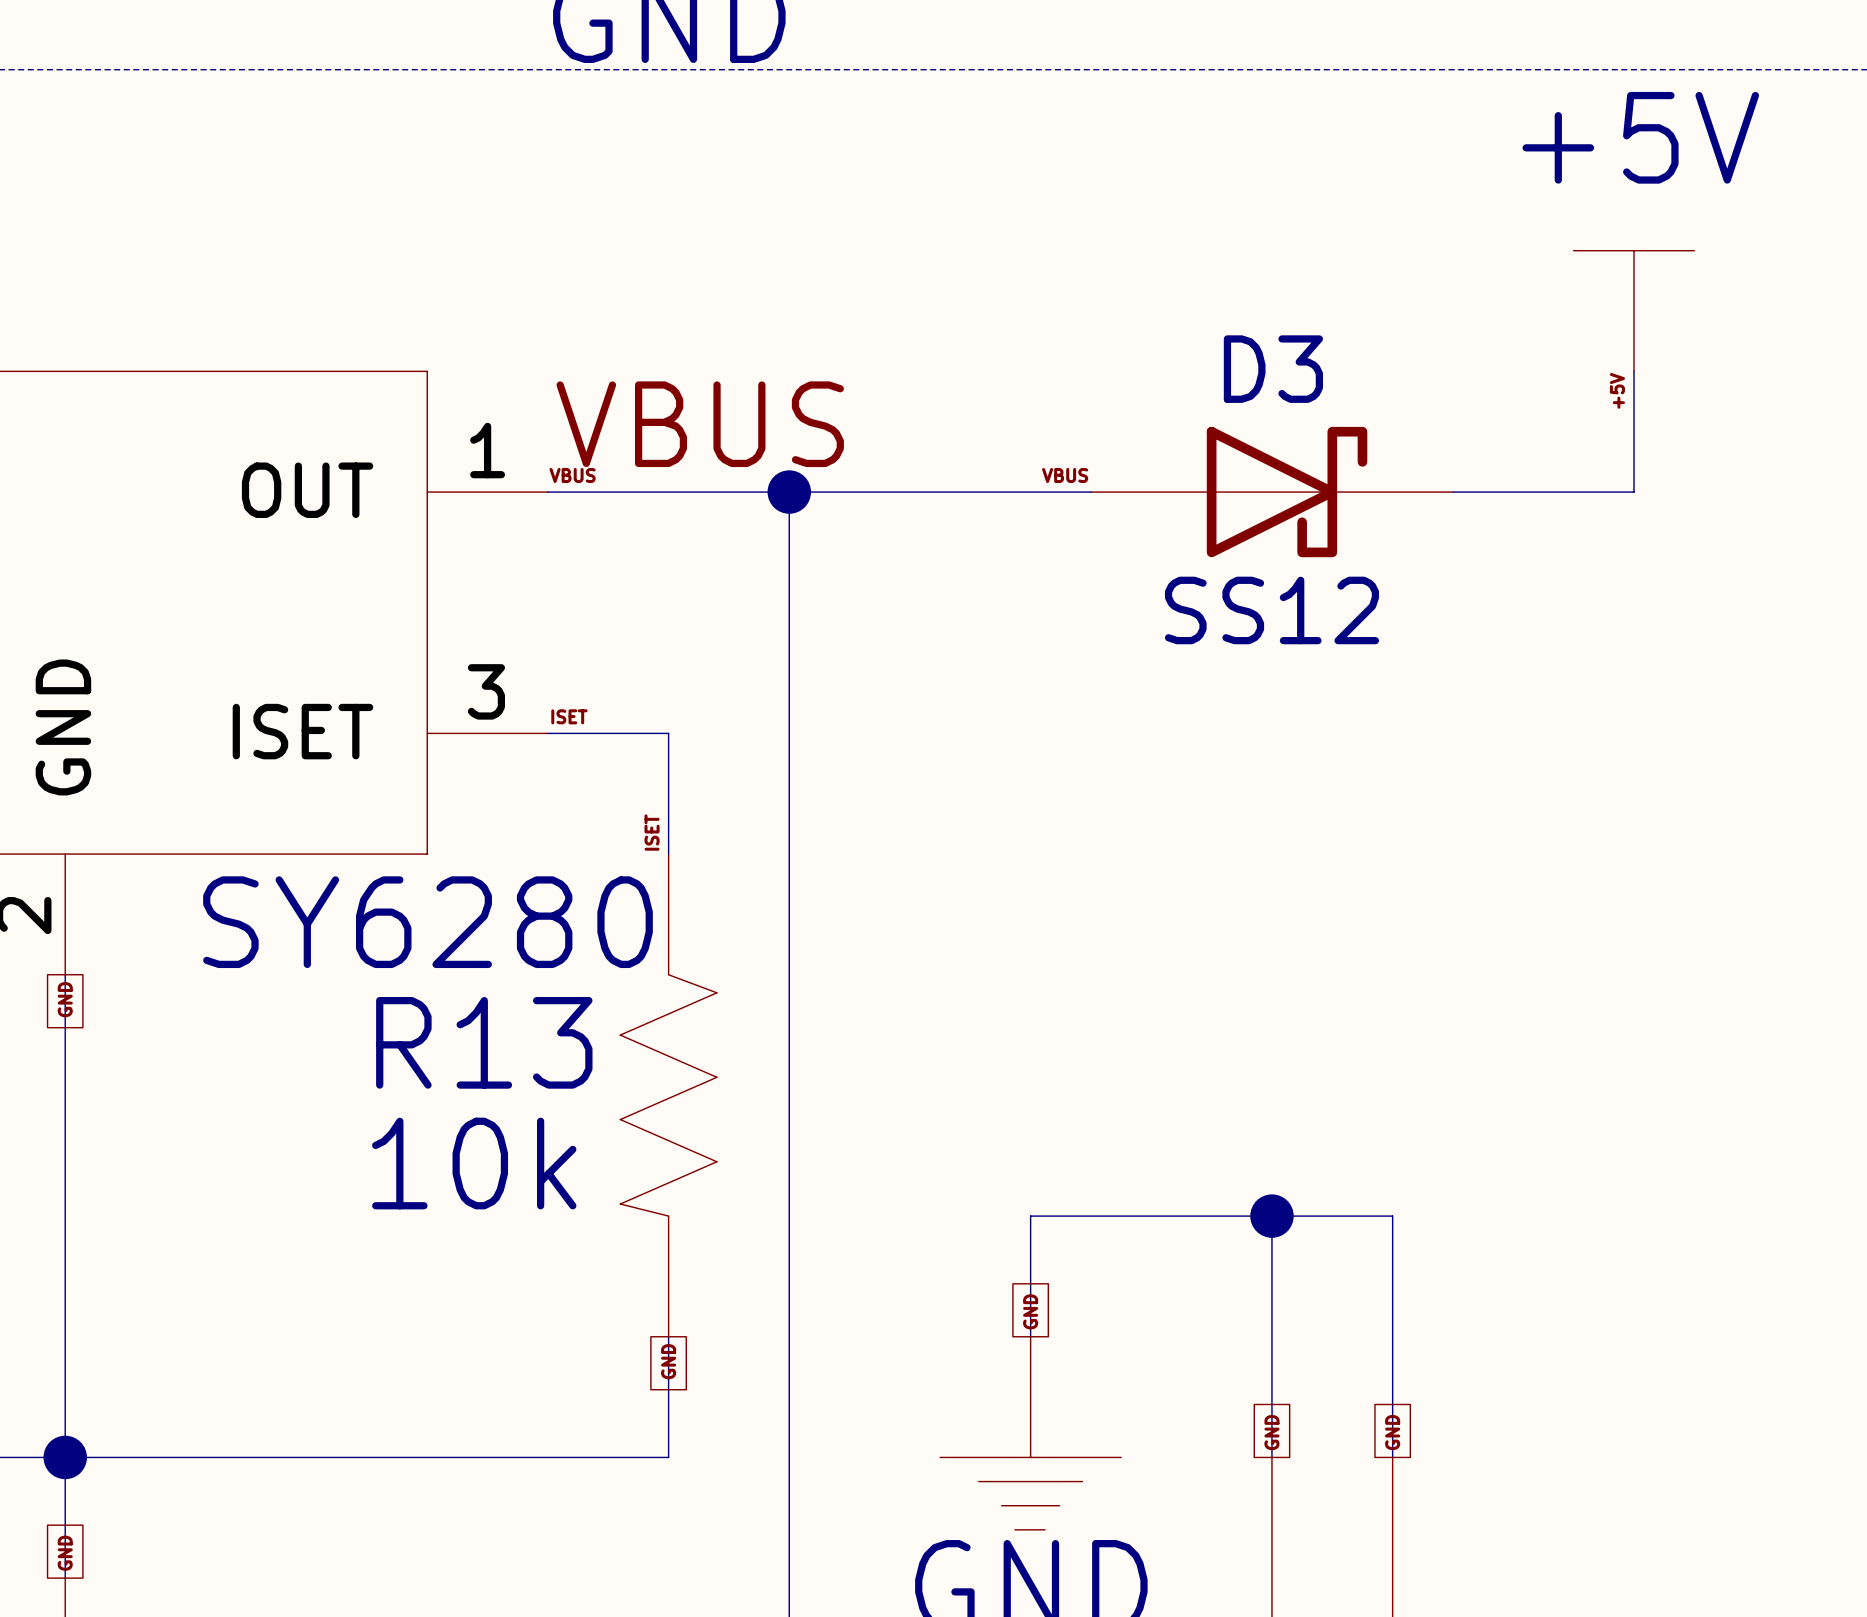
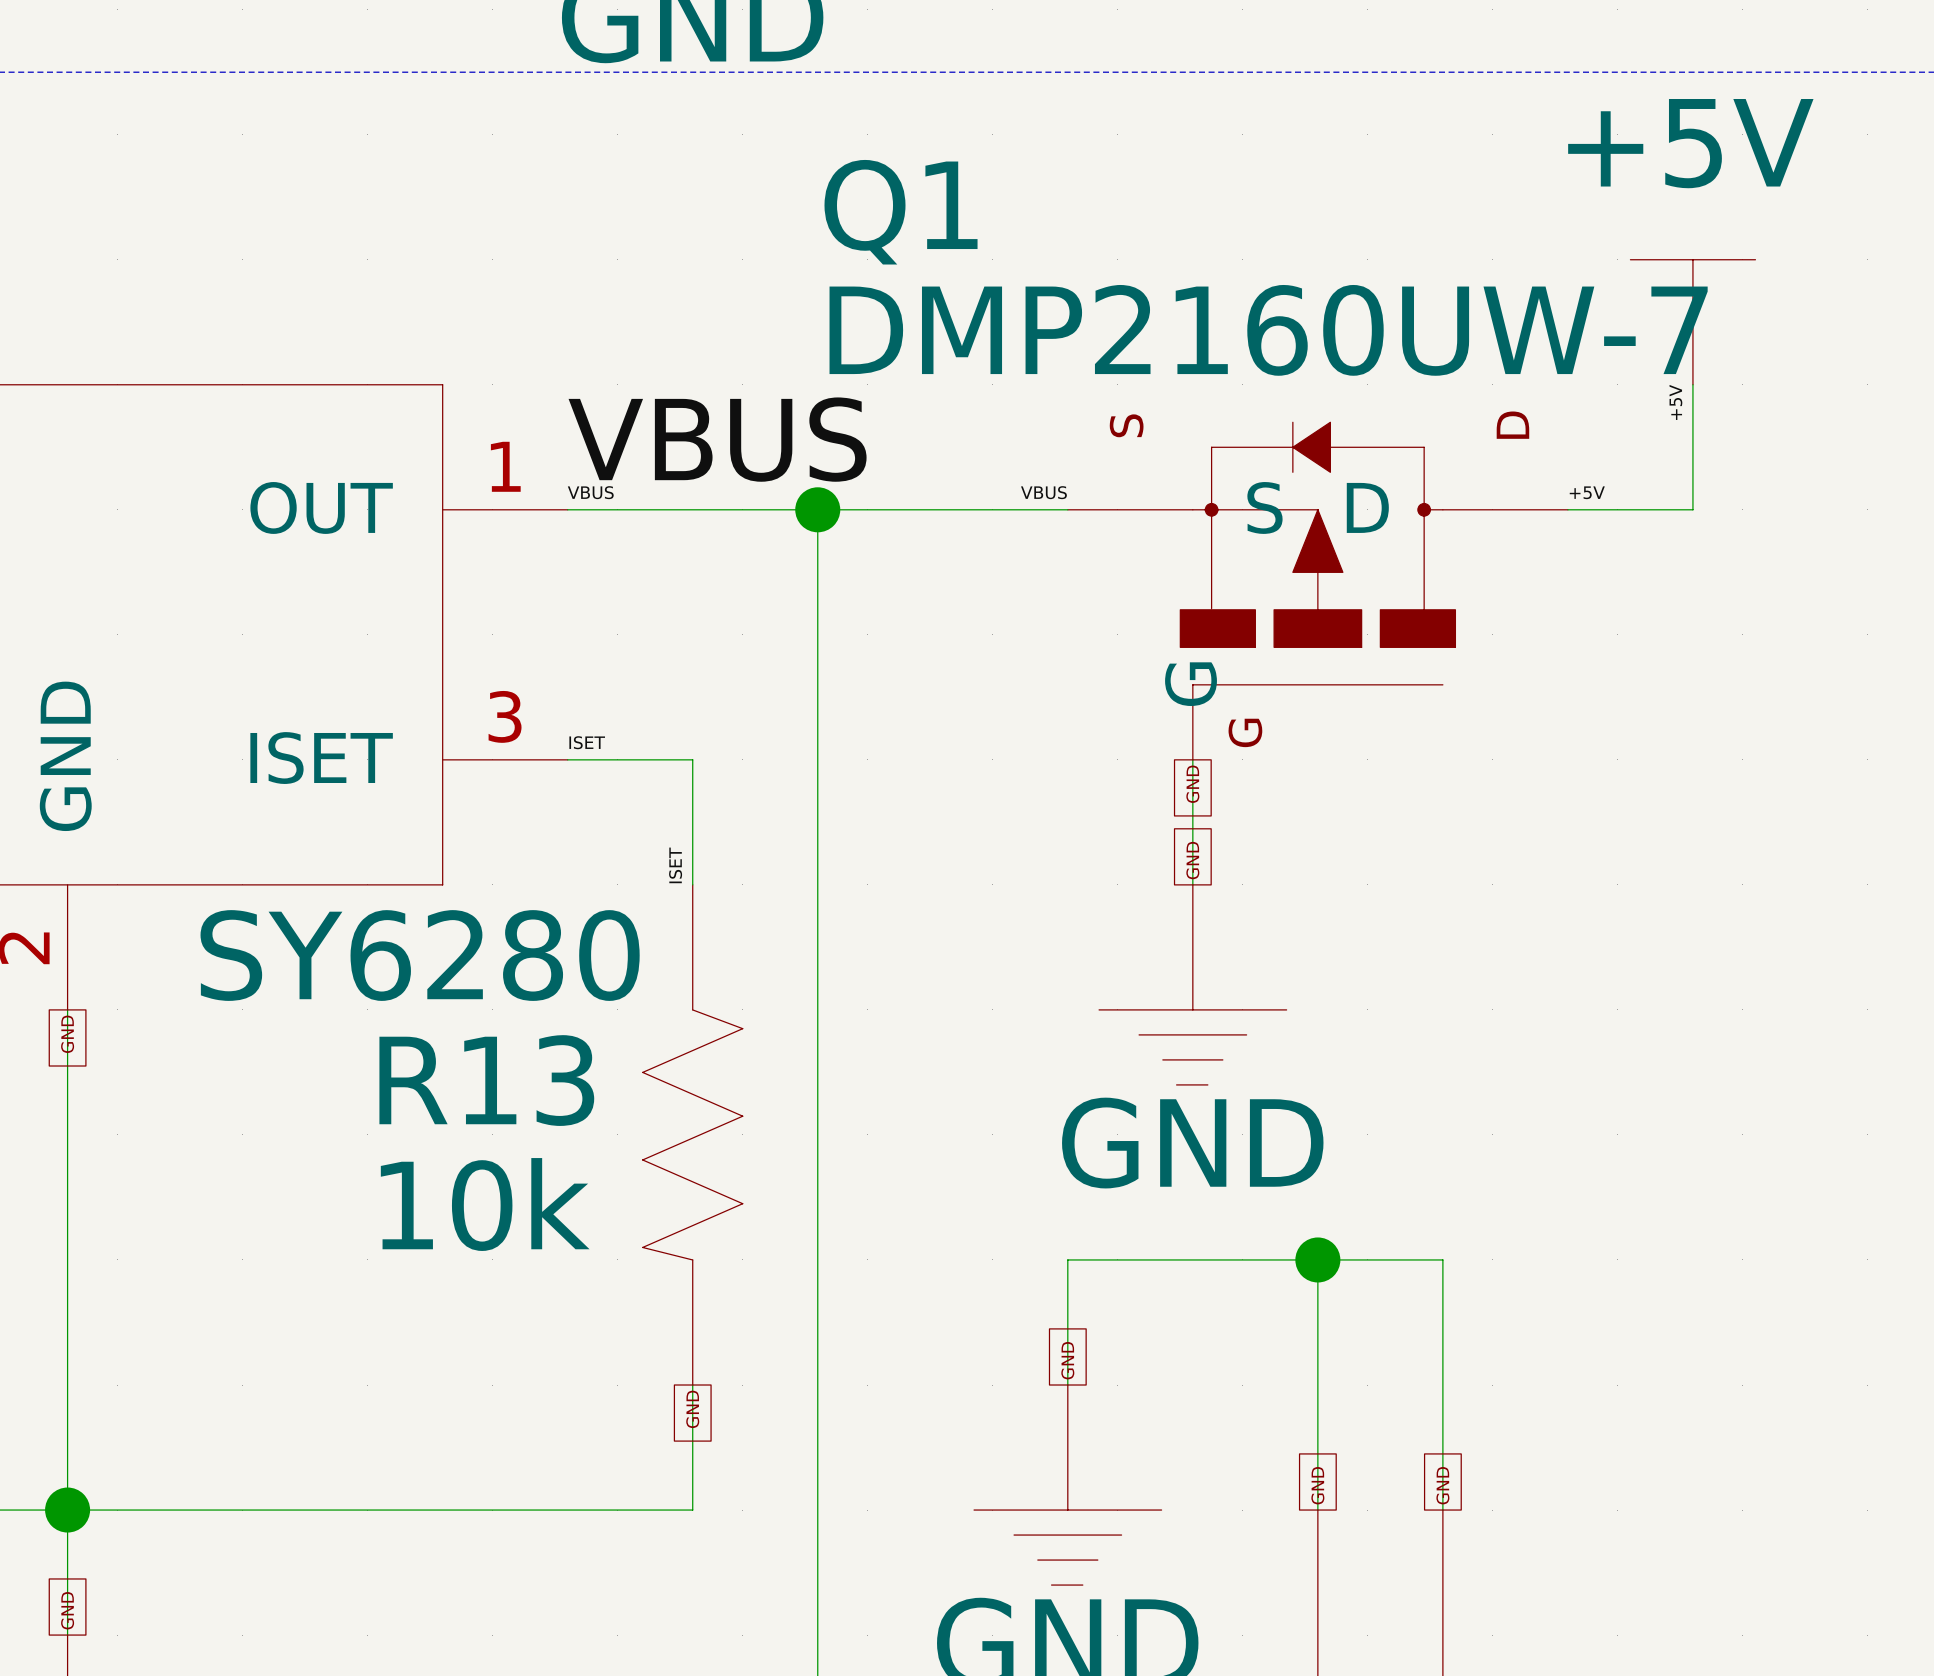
label position: VBUS (1065, 475) -> VBUS (1043, 492)
label: none -> +5V (1587, 492)
D3: SS12 (1271, 492) -> none
Q1: none -> DMP2160UW-7 (1317, 591)
wire: none -> (1192, 759) (1192, 884)
global label: none -> GND (1192, 784)
global label: none -> GND (1192, 860)
power symbol: none -> GND (1192, 984)

